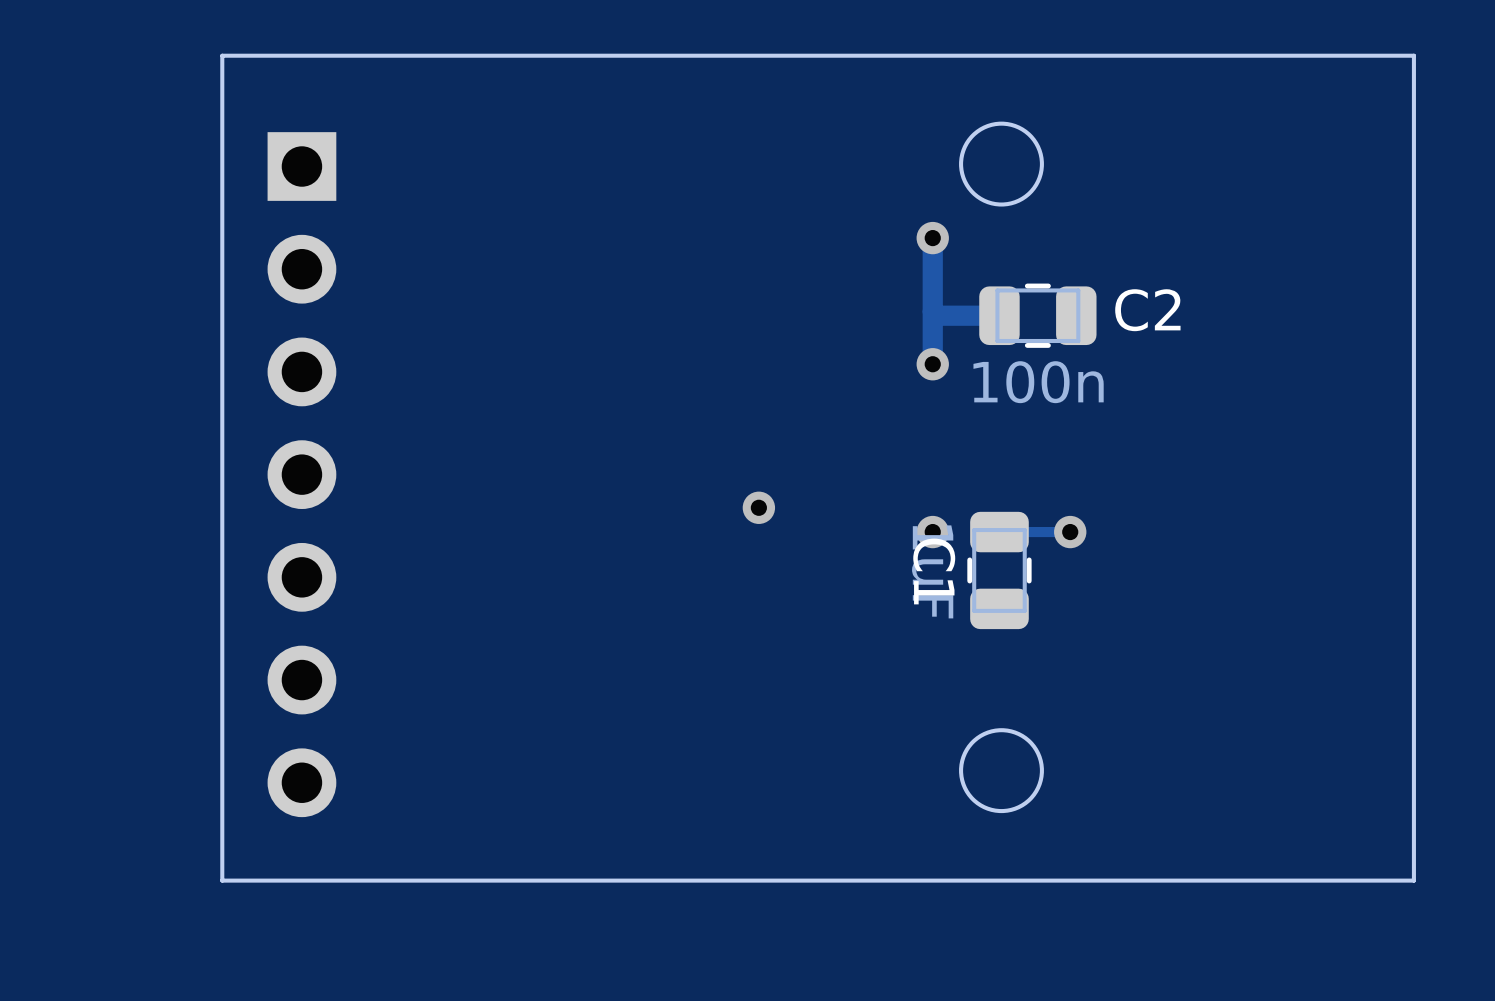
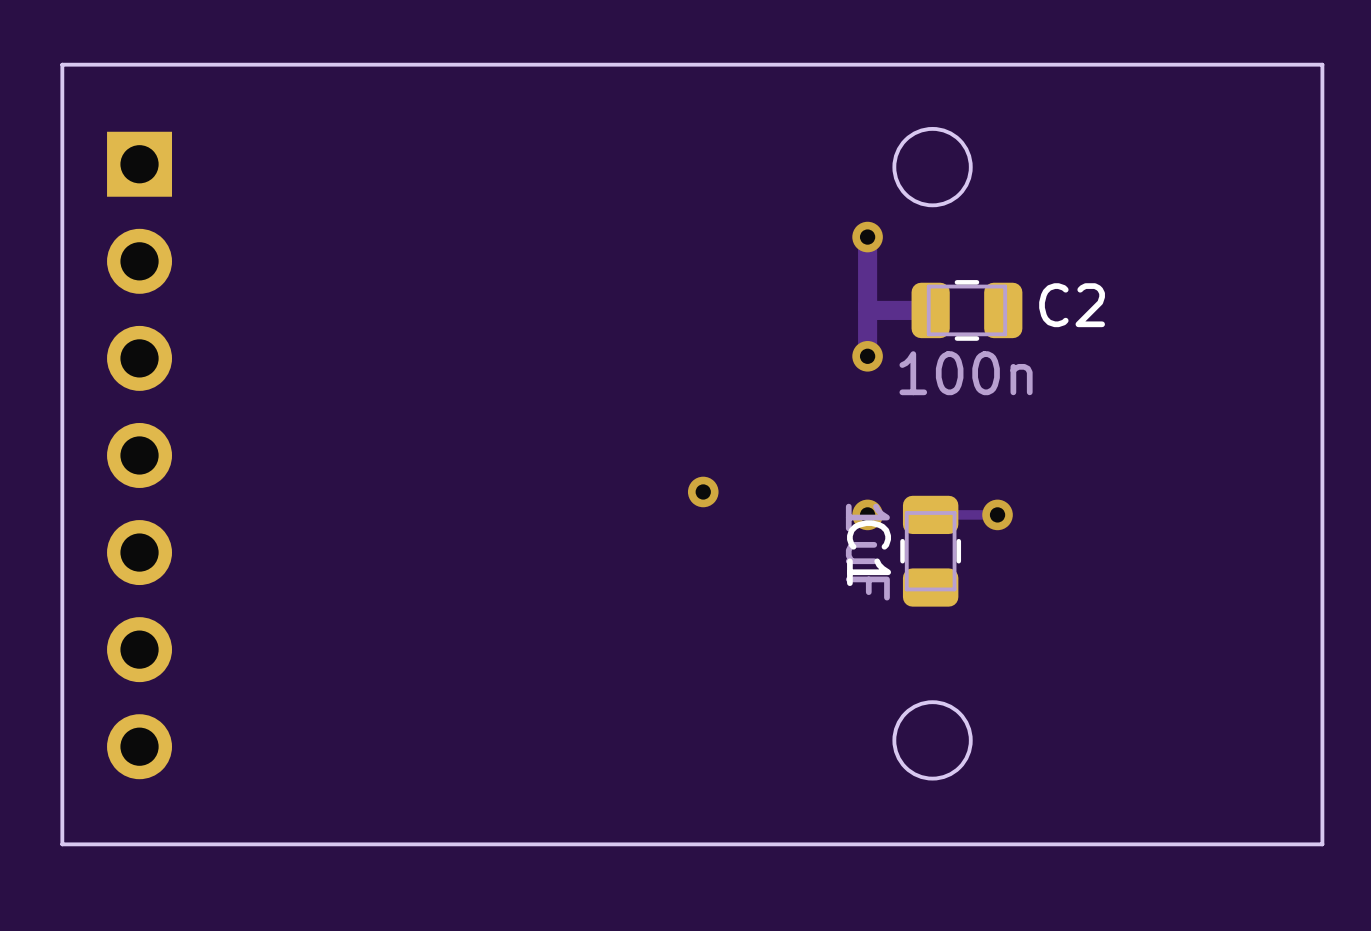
board edge: (222, 55) (222, 880) -> (196, 64) (62, 64) (62, 844) (196, 844)
part position: (301, 474) -> (139, 455)

